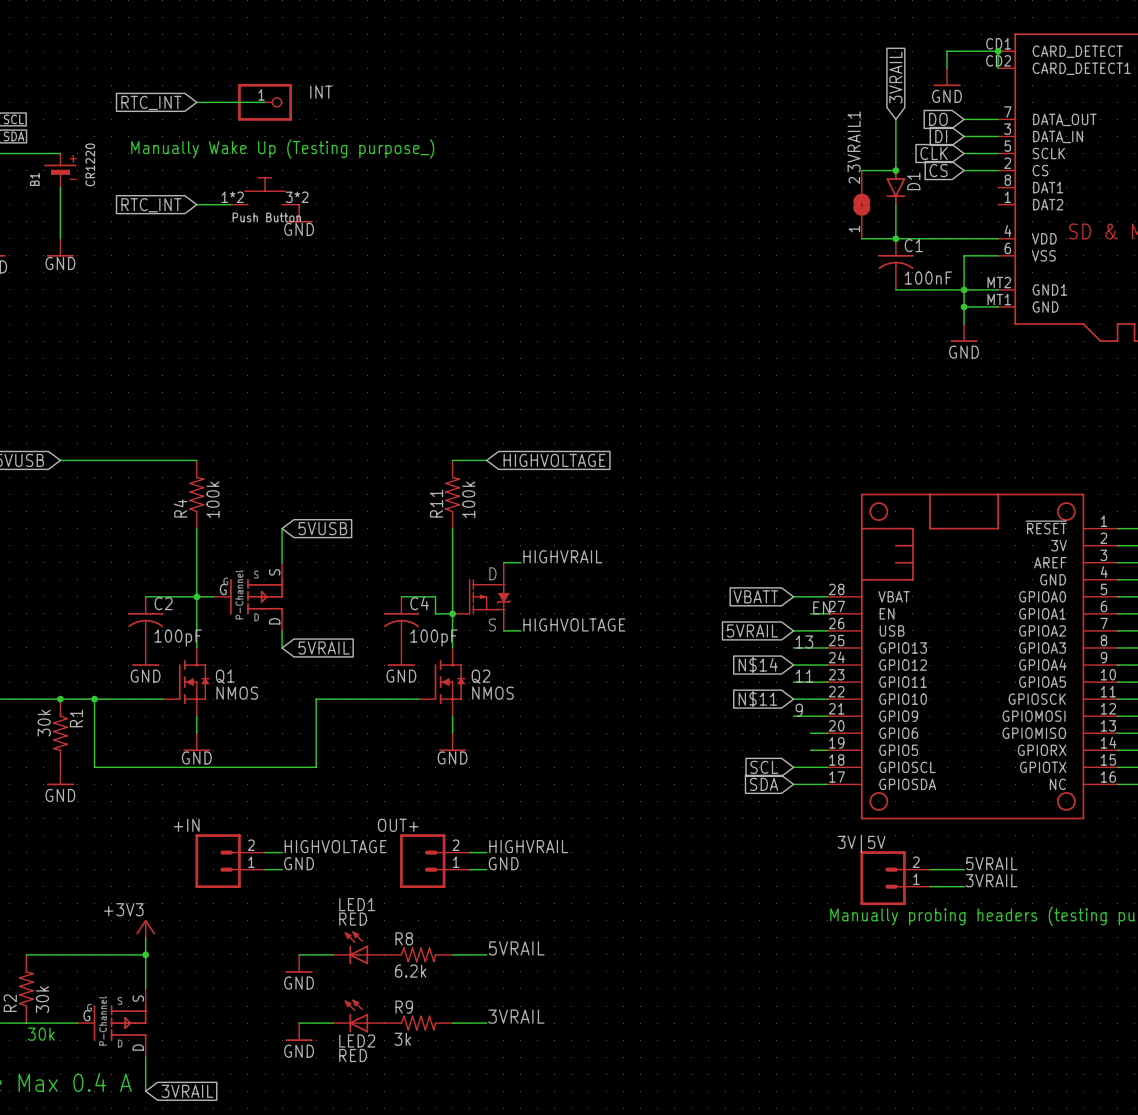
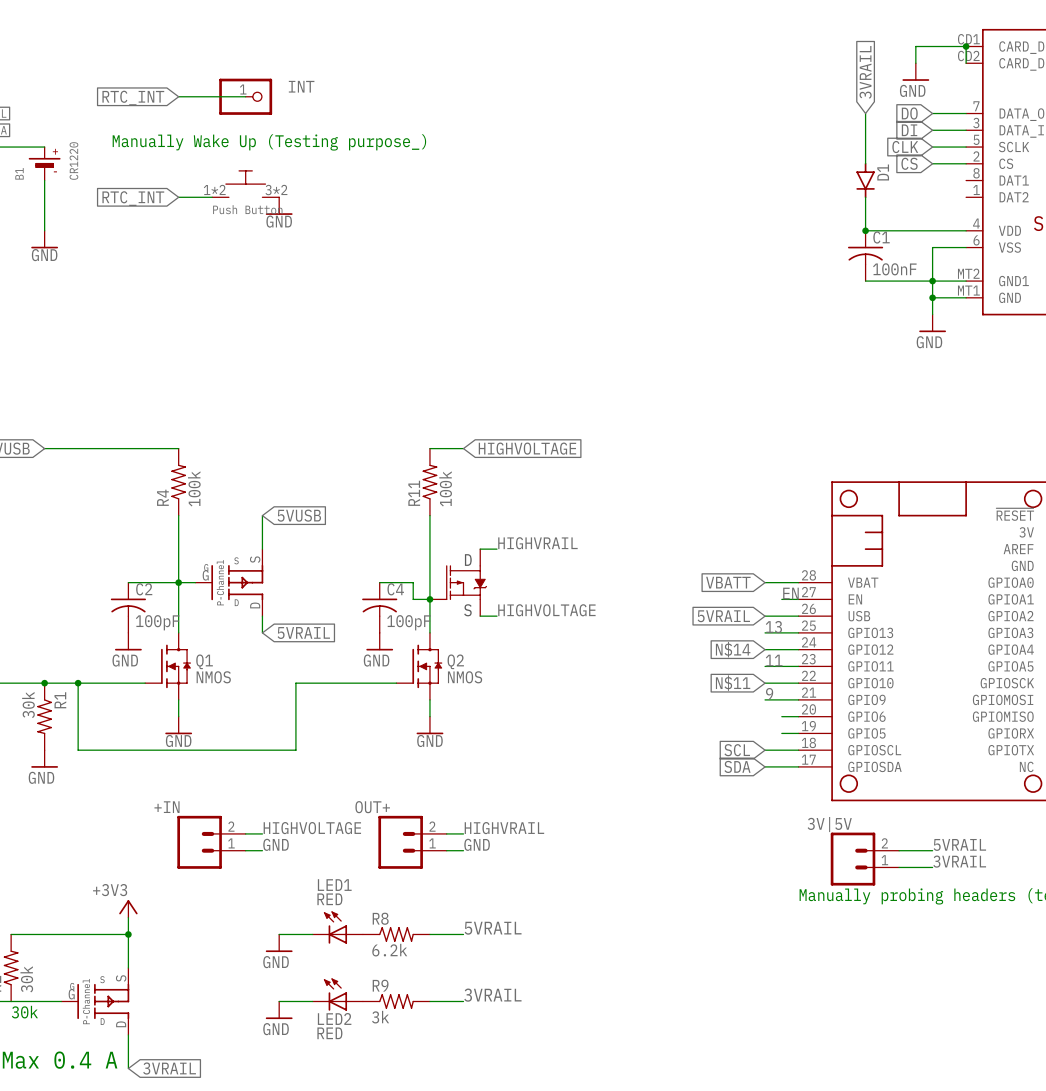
wire: (861, 170) (895, 170) -> none
junction: (895, 170) -> none
3VRAIL1: (861, 204) -> none
wire: (861, 238) (895, 238) -> none

